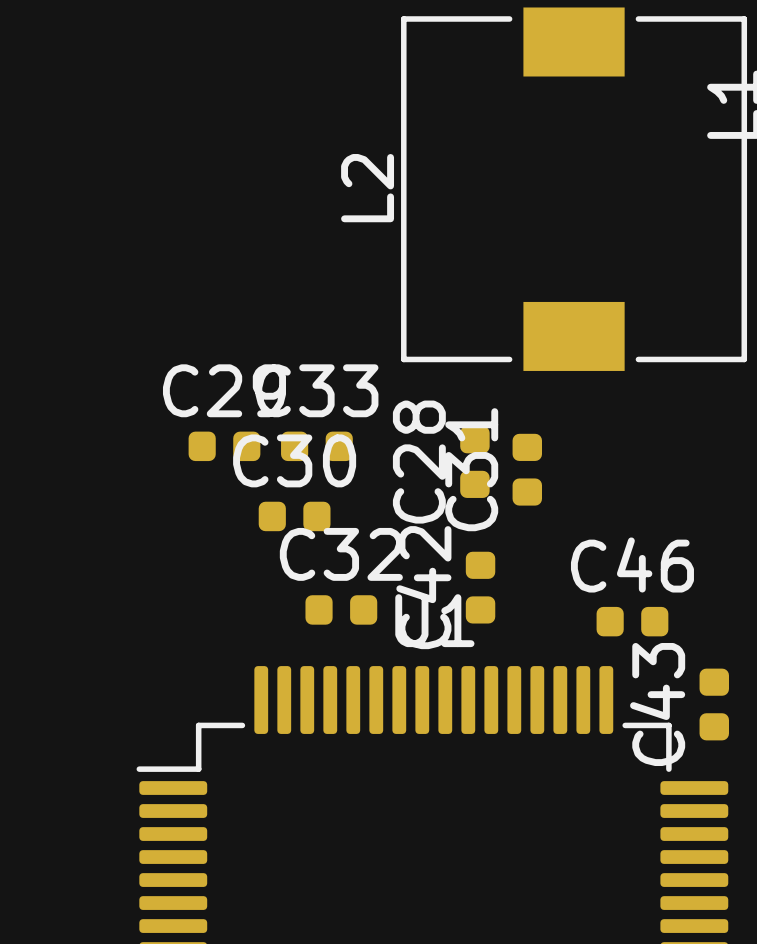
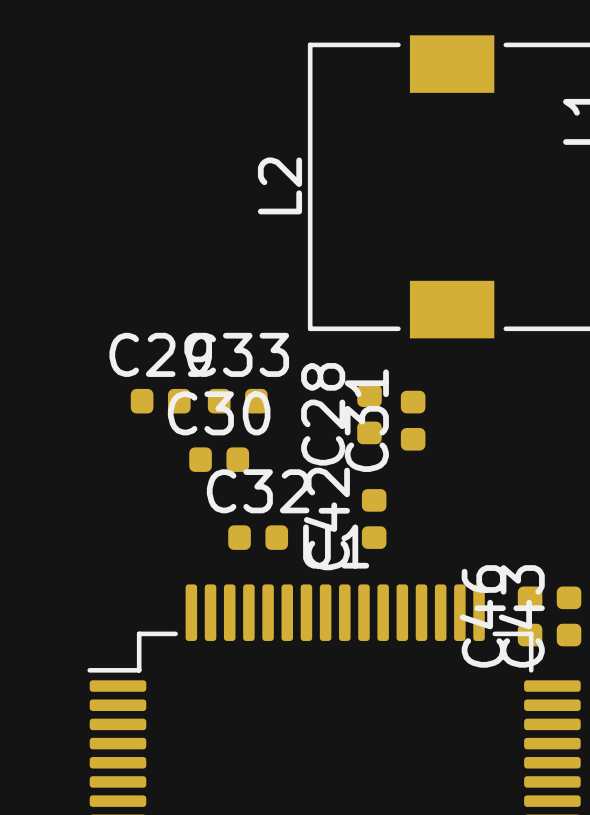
C46 rotation: 0° (632, 621) -> 90° clockwise (530, 616)
C46 position: (632, 621) -> (530, 616)

